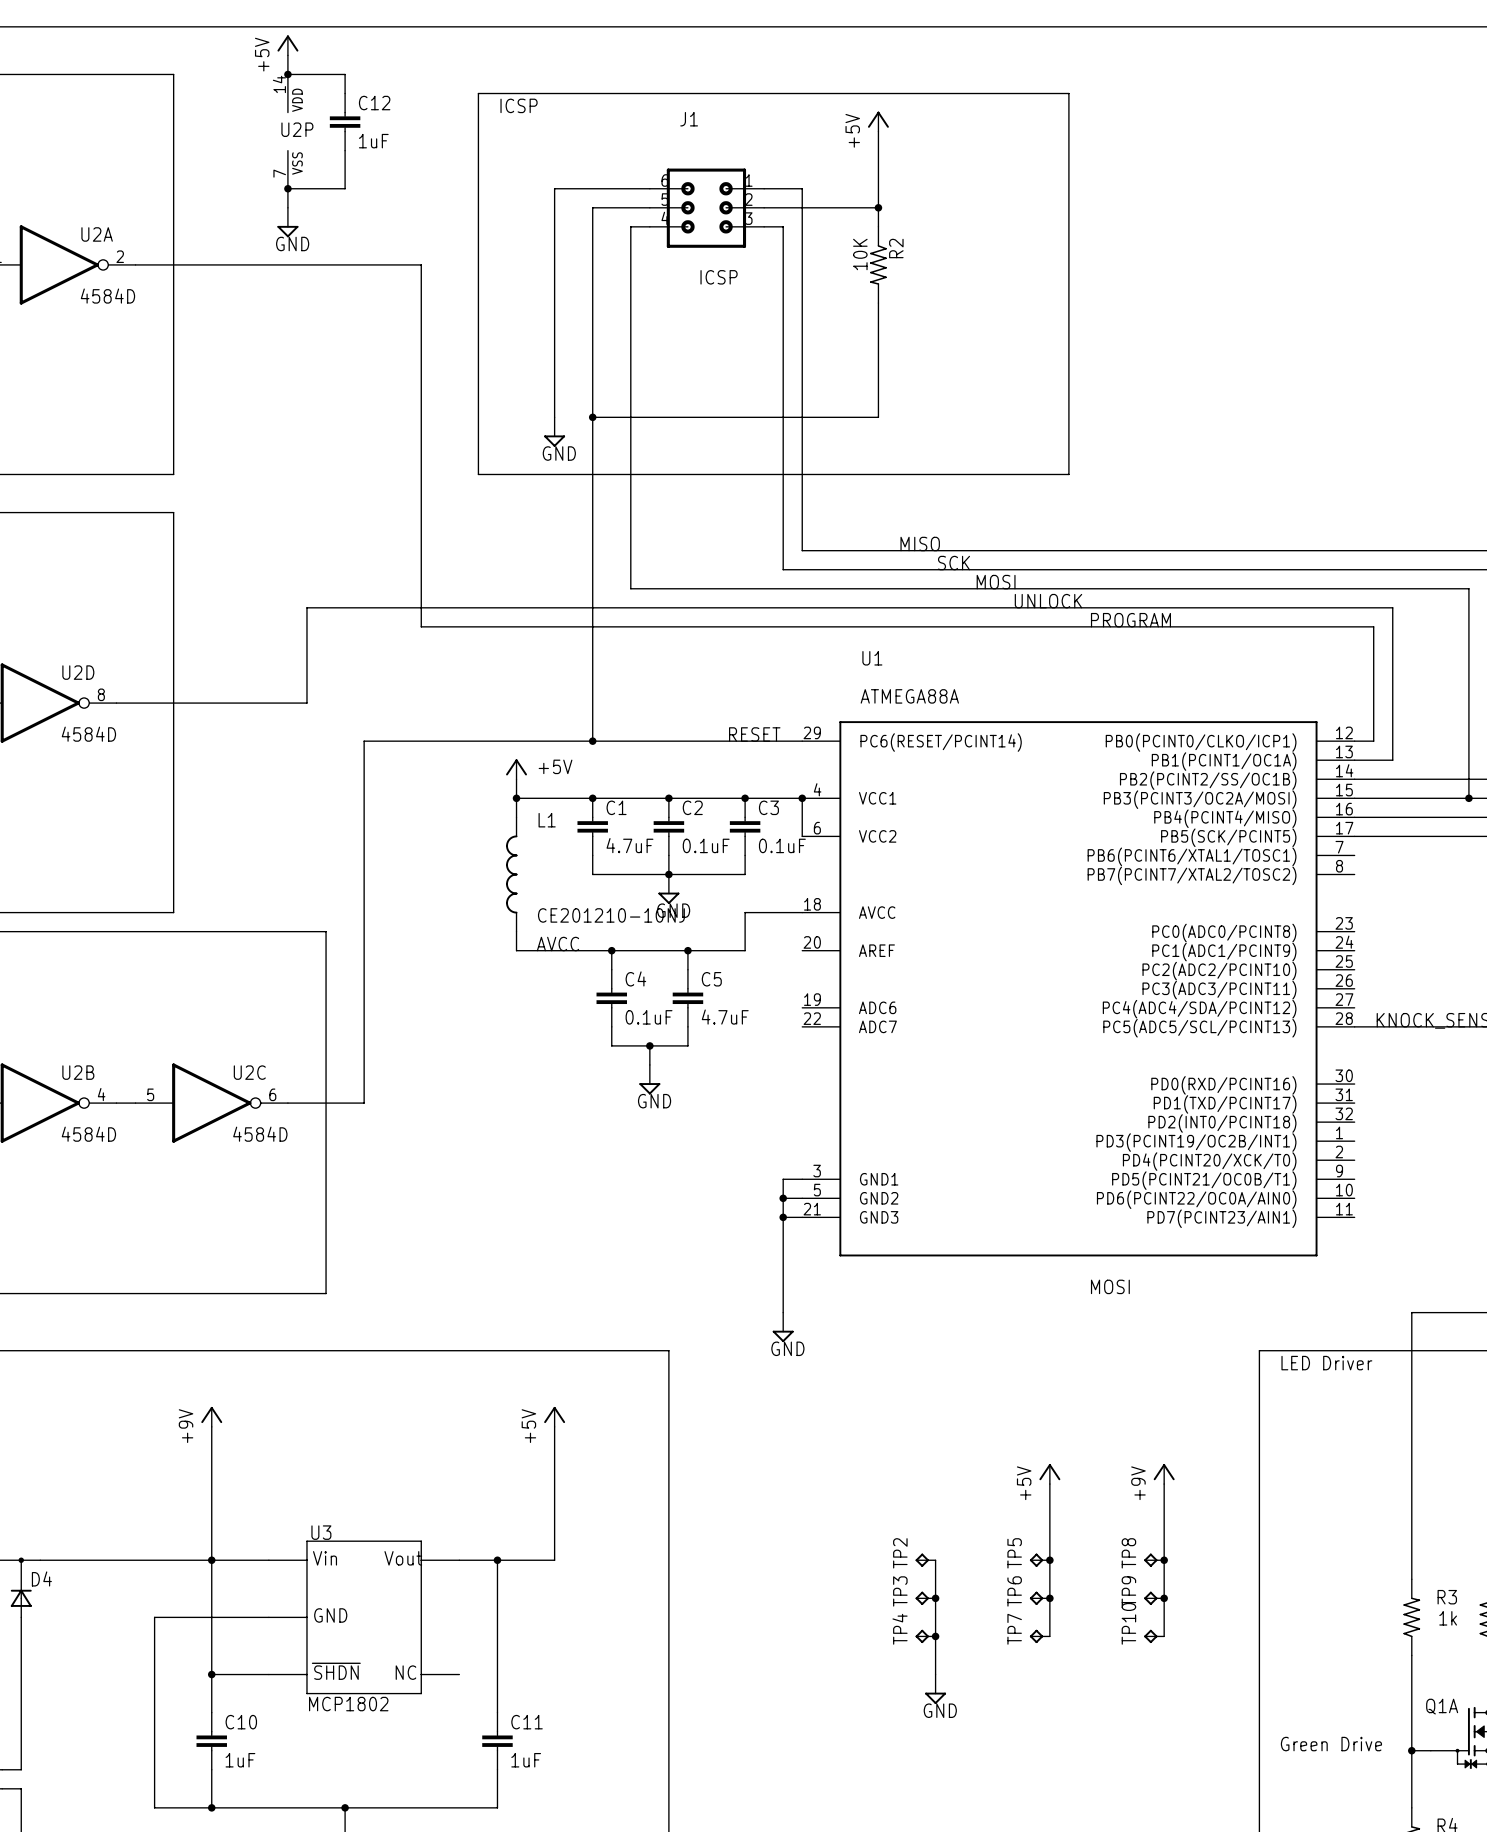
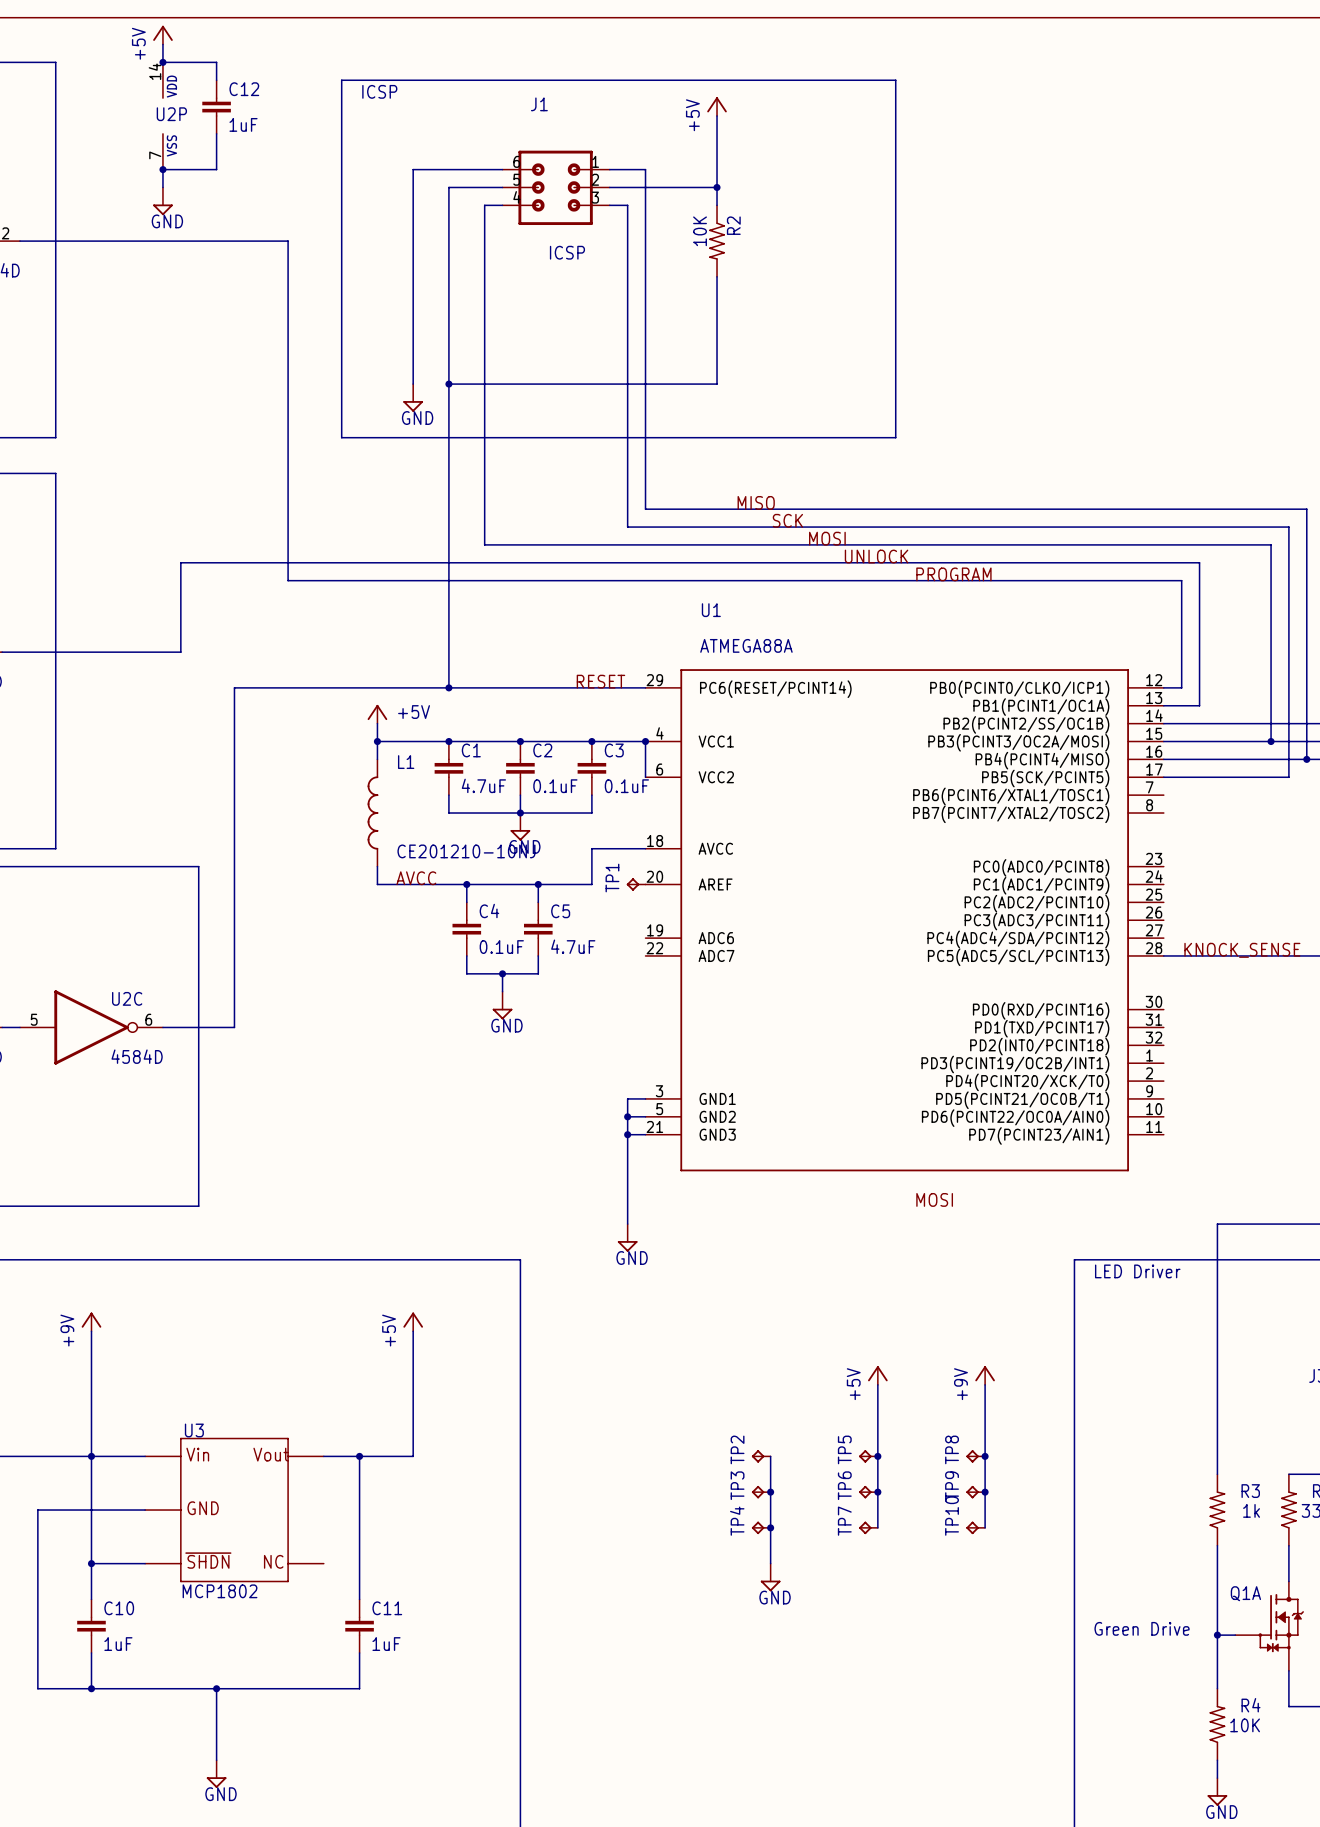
TP1: none -> (636, 884)

